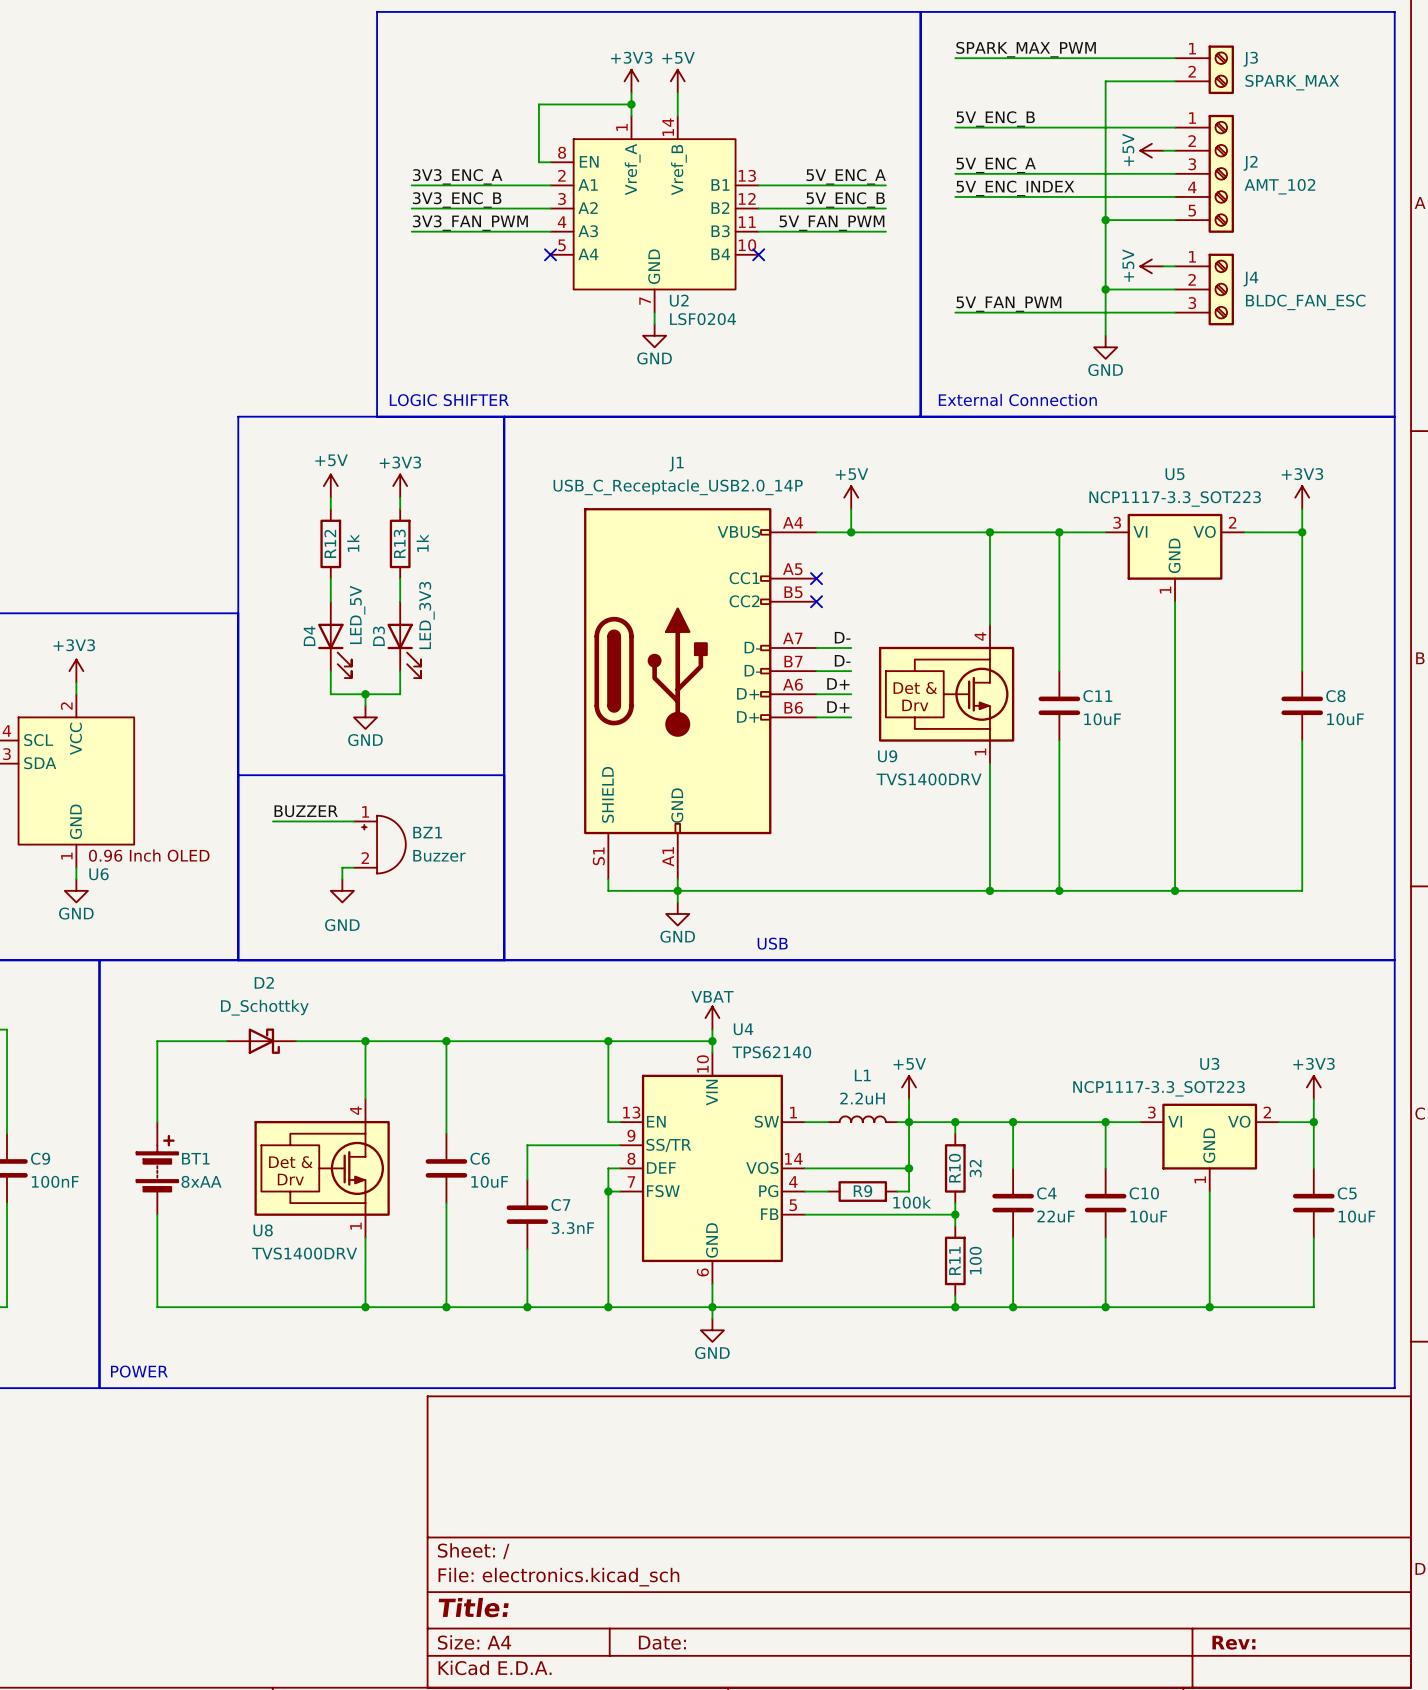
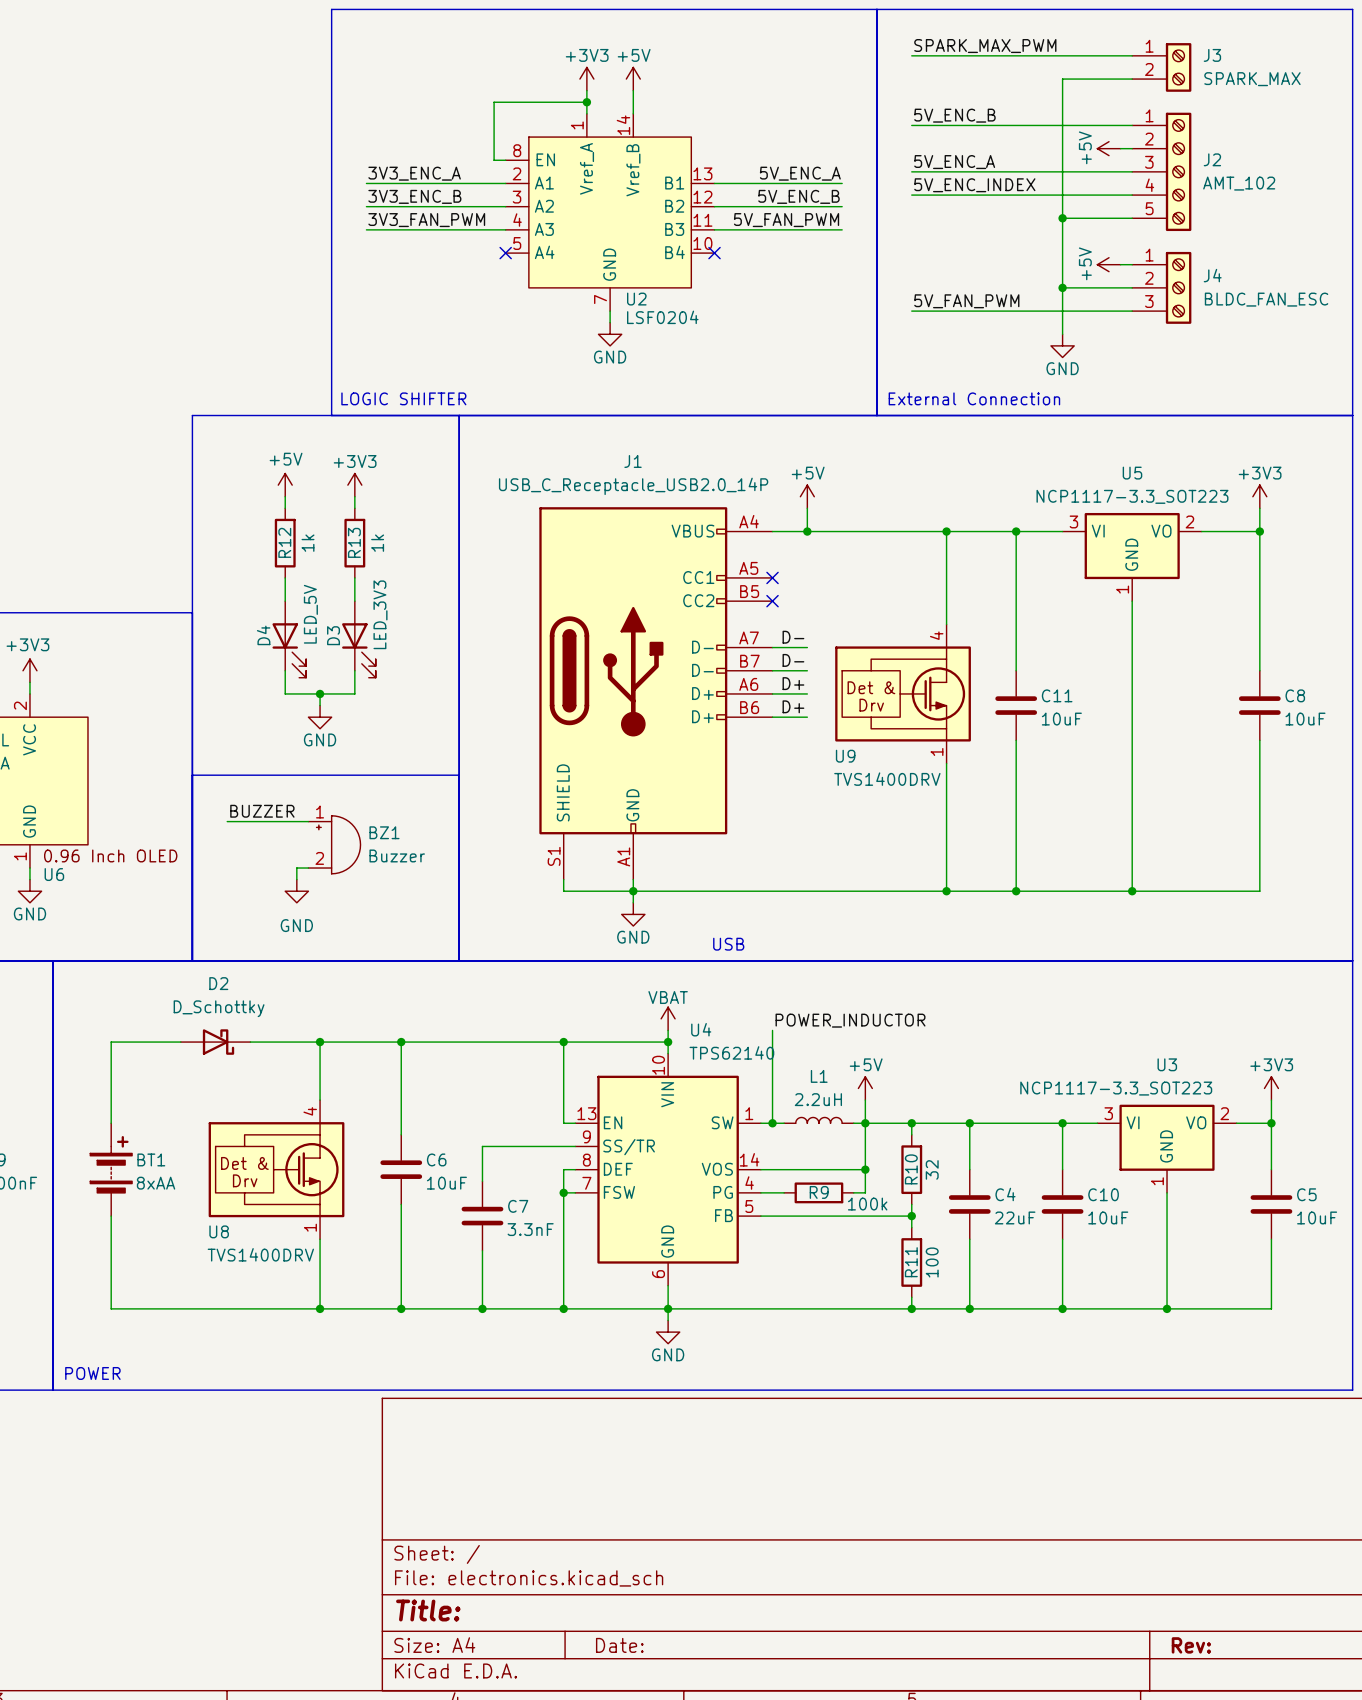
label: none -> POWER_INDUCTOR (850, 1020)
wire: none -> (772, 1030) (772, 1123)
junction: none -> (772, 1123)

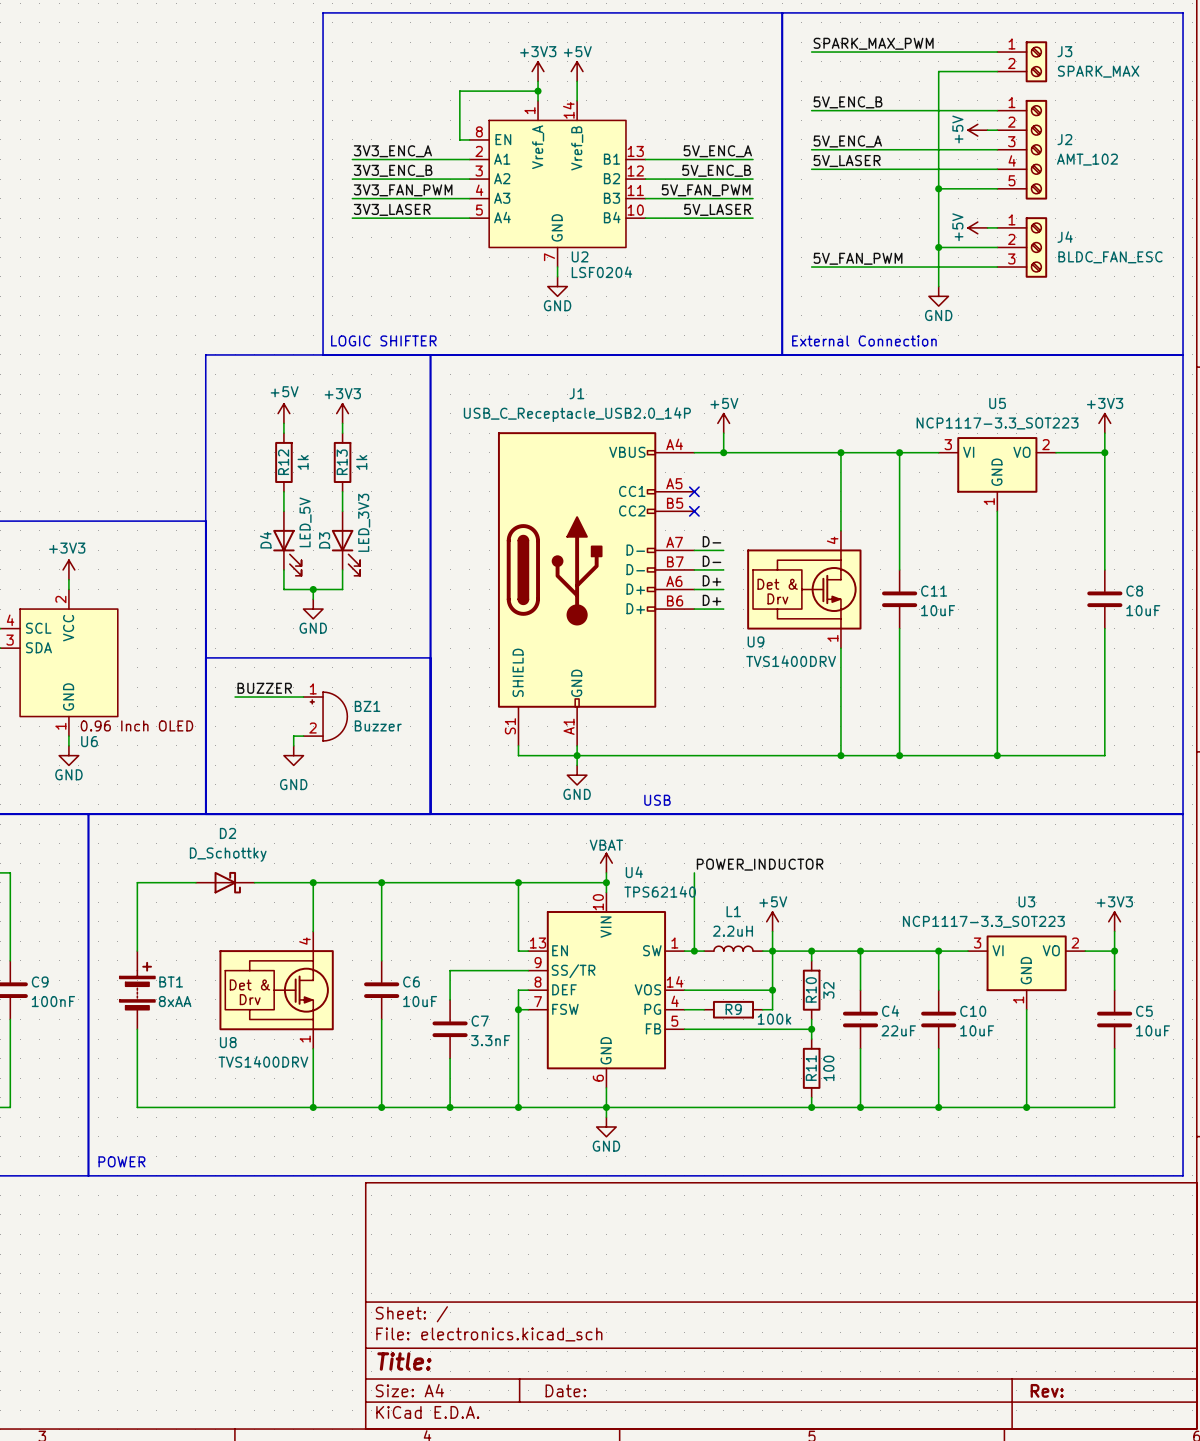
label: 5V_ENC_INDEX (974, 185) -> 5V_LASER (847, 161)
label: none -> 3V3_LASER (392, 209)
label: none -> 5V_LASER (717, 209)
wire: none -> (352, 218) (469, 218)
no-connect mark: (505, 253) -> none
wire: none -> (645, 218) (753, 218)
no-connect mark: (714, 253) -> none

